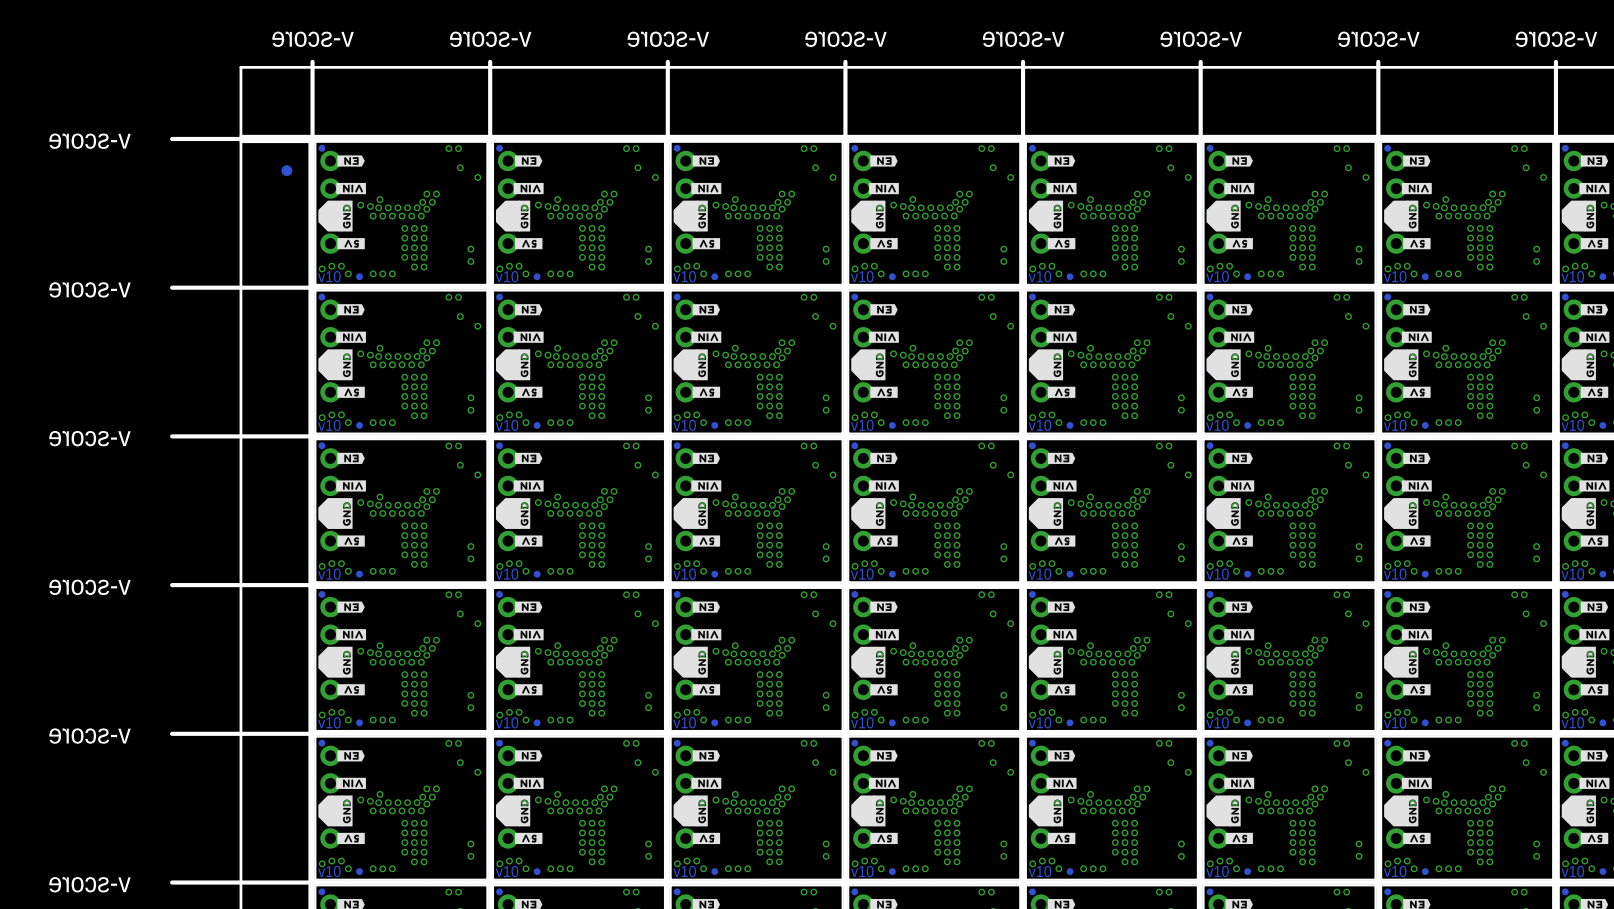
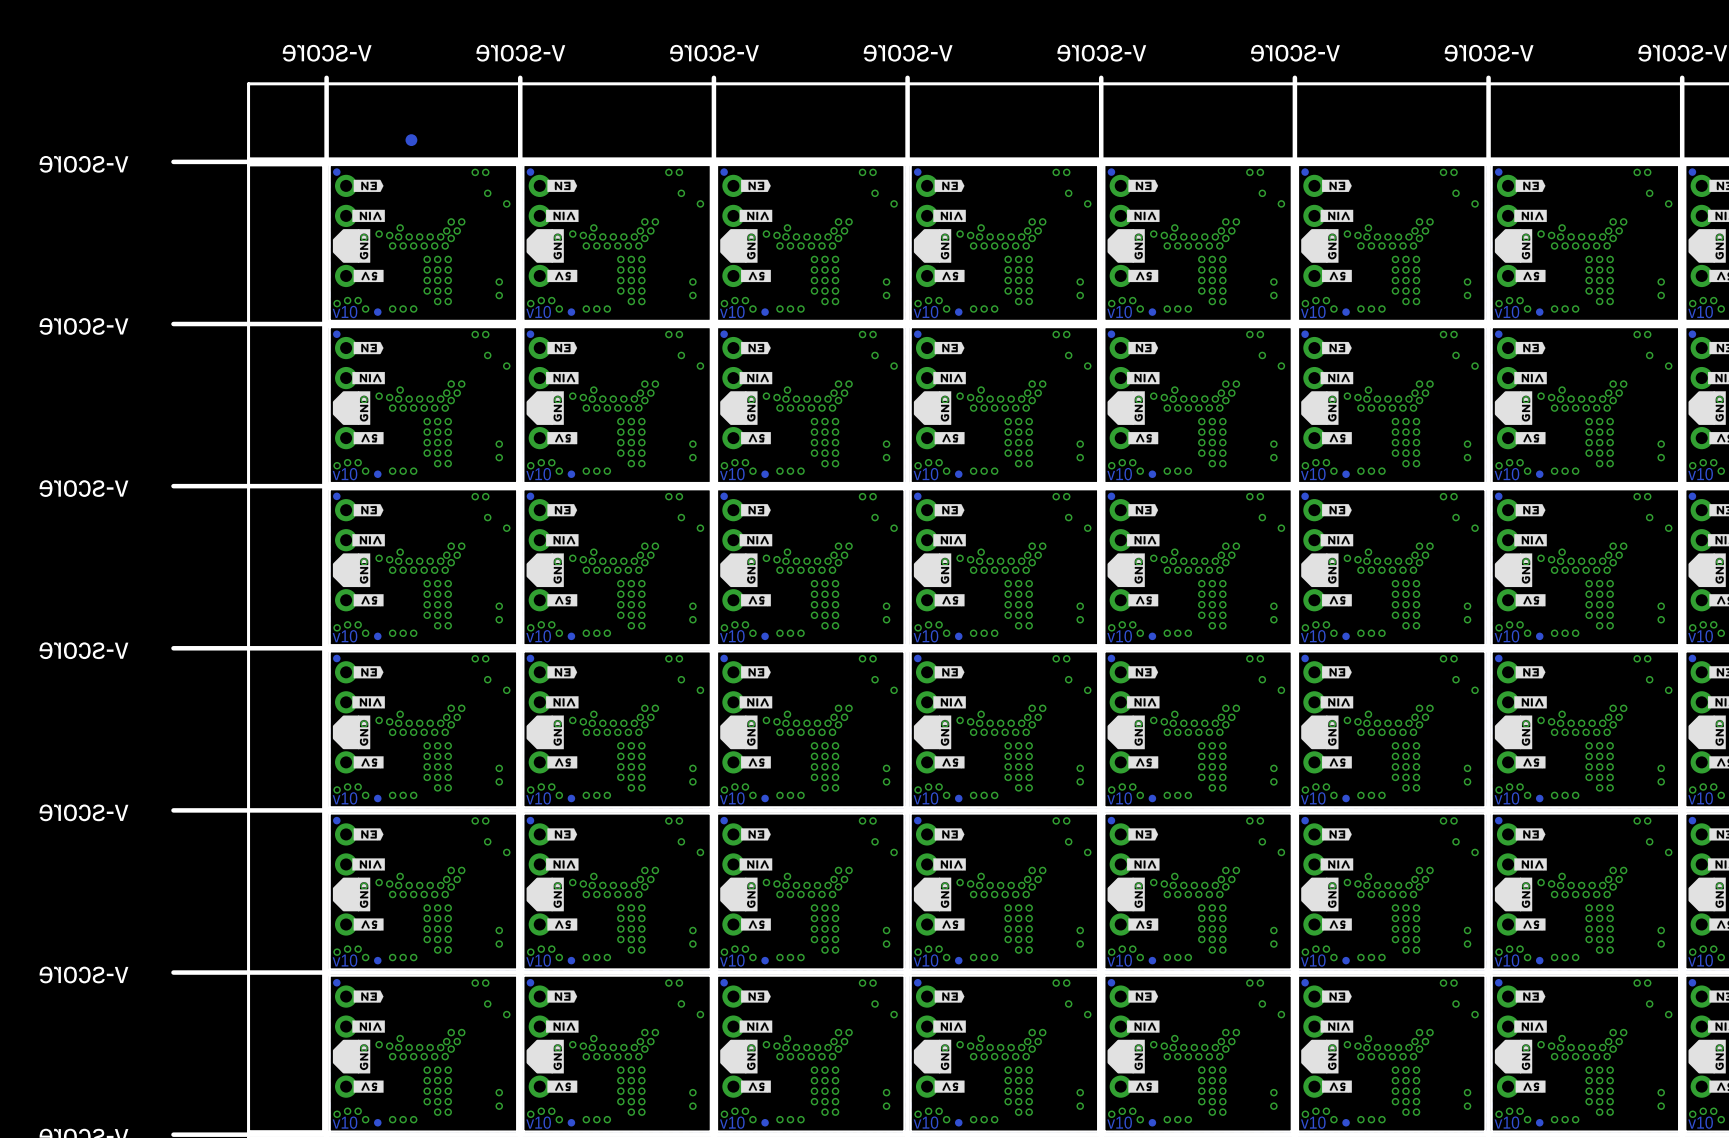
part position: (286, 170) -> (411, 140)

